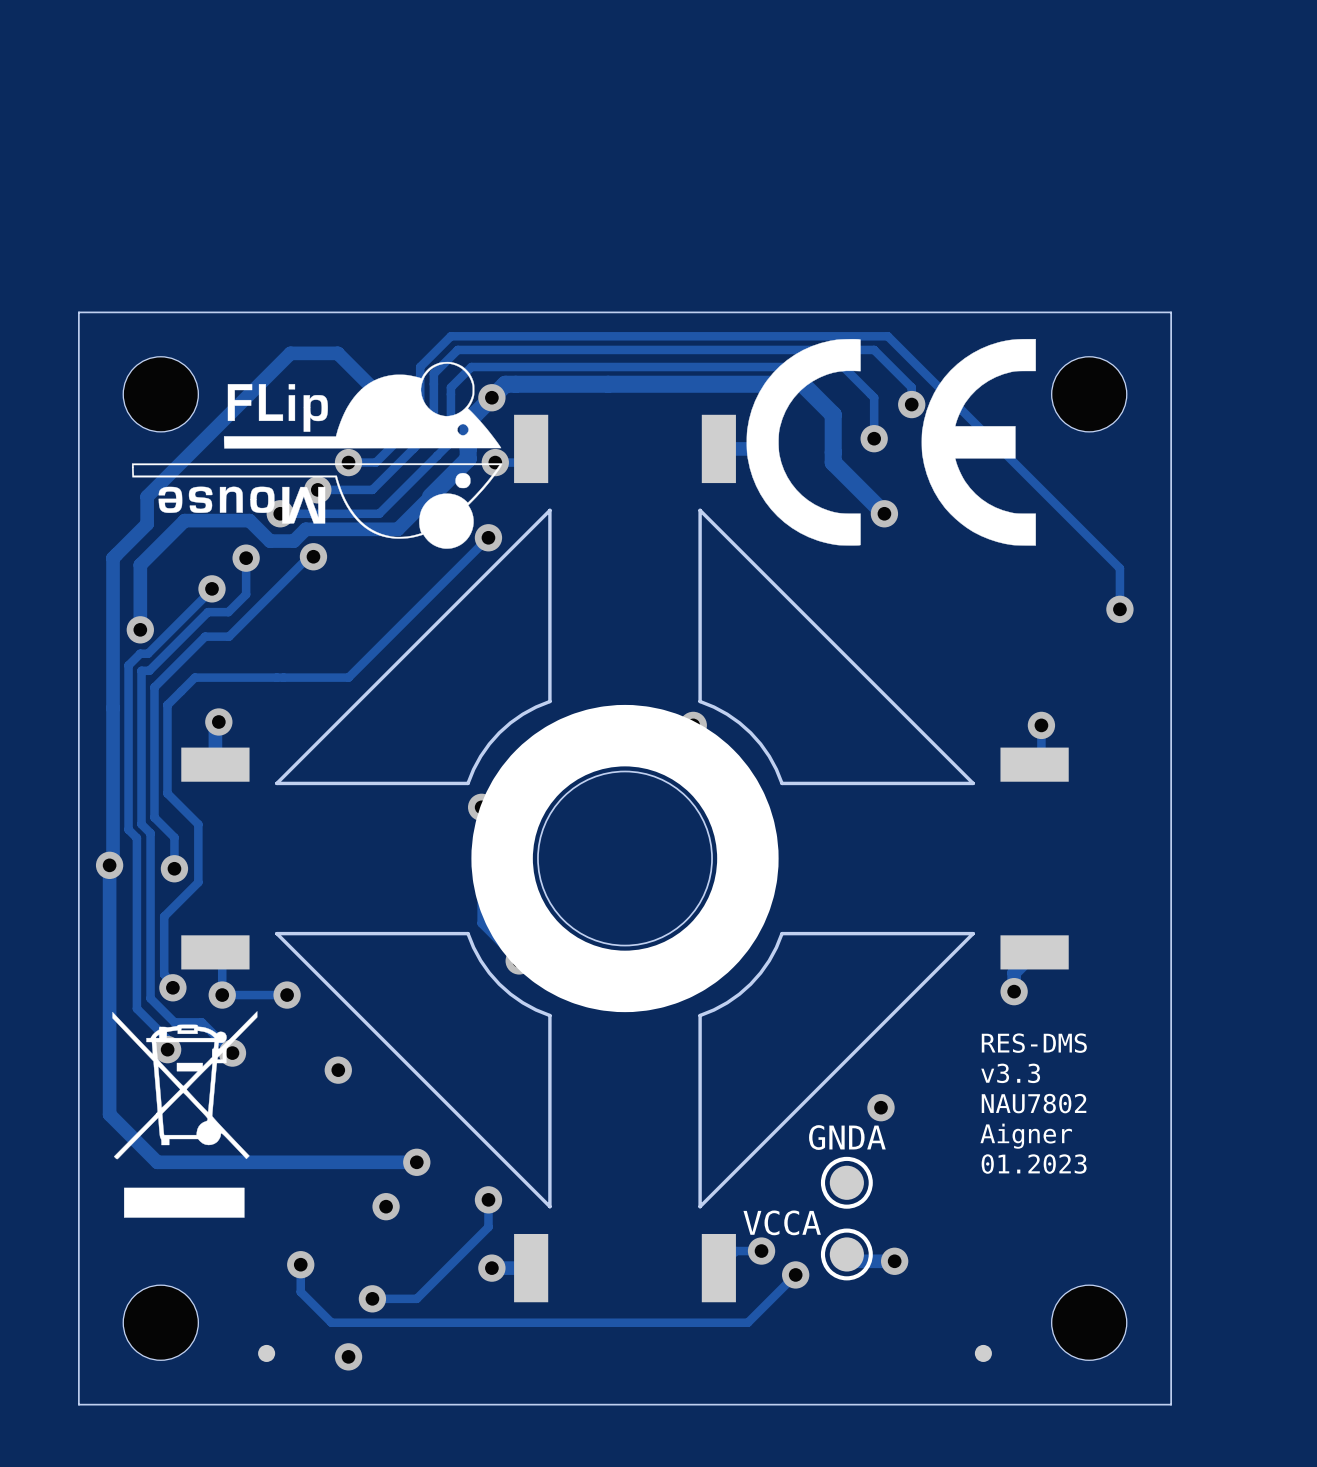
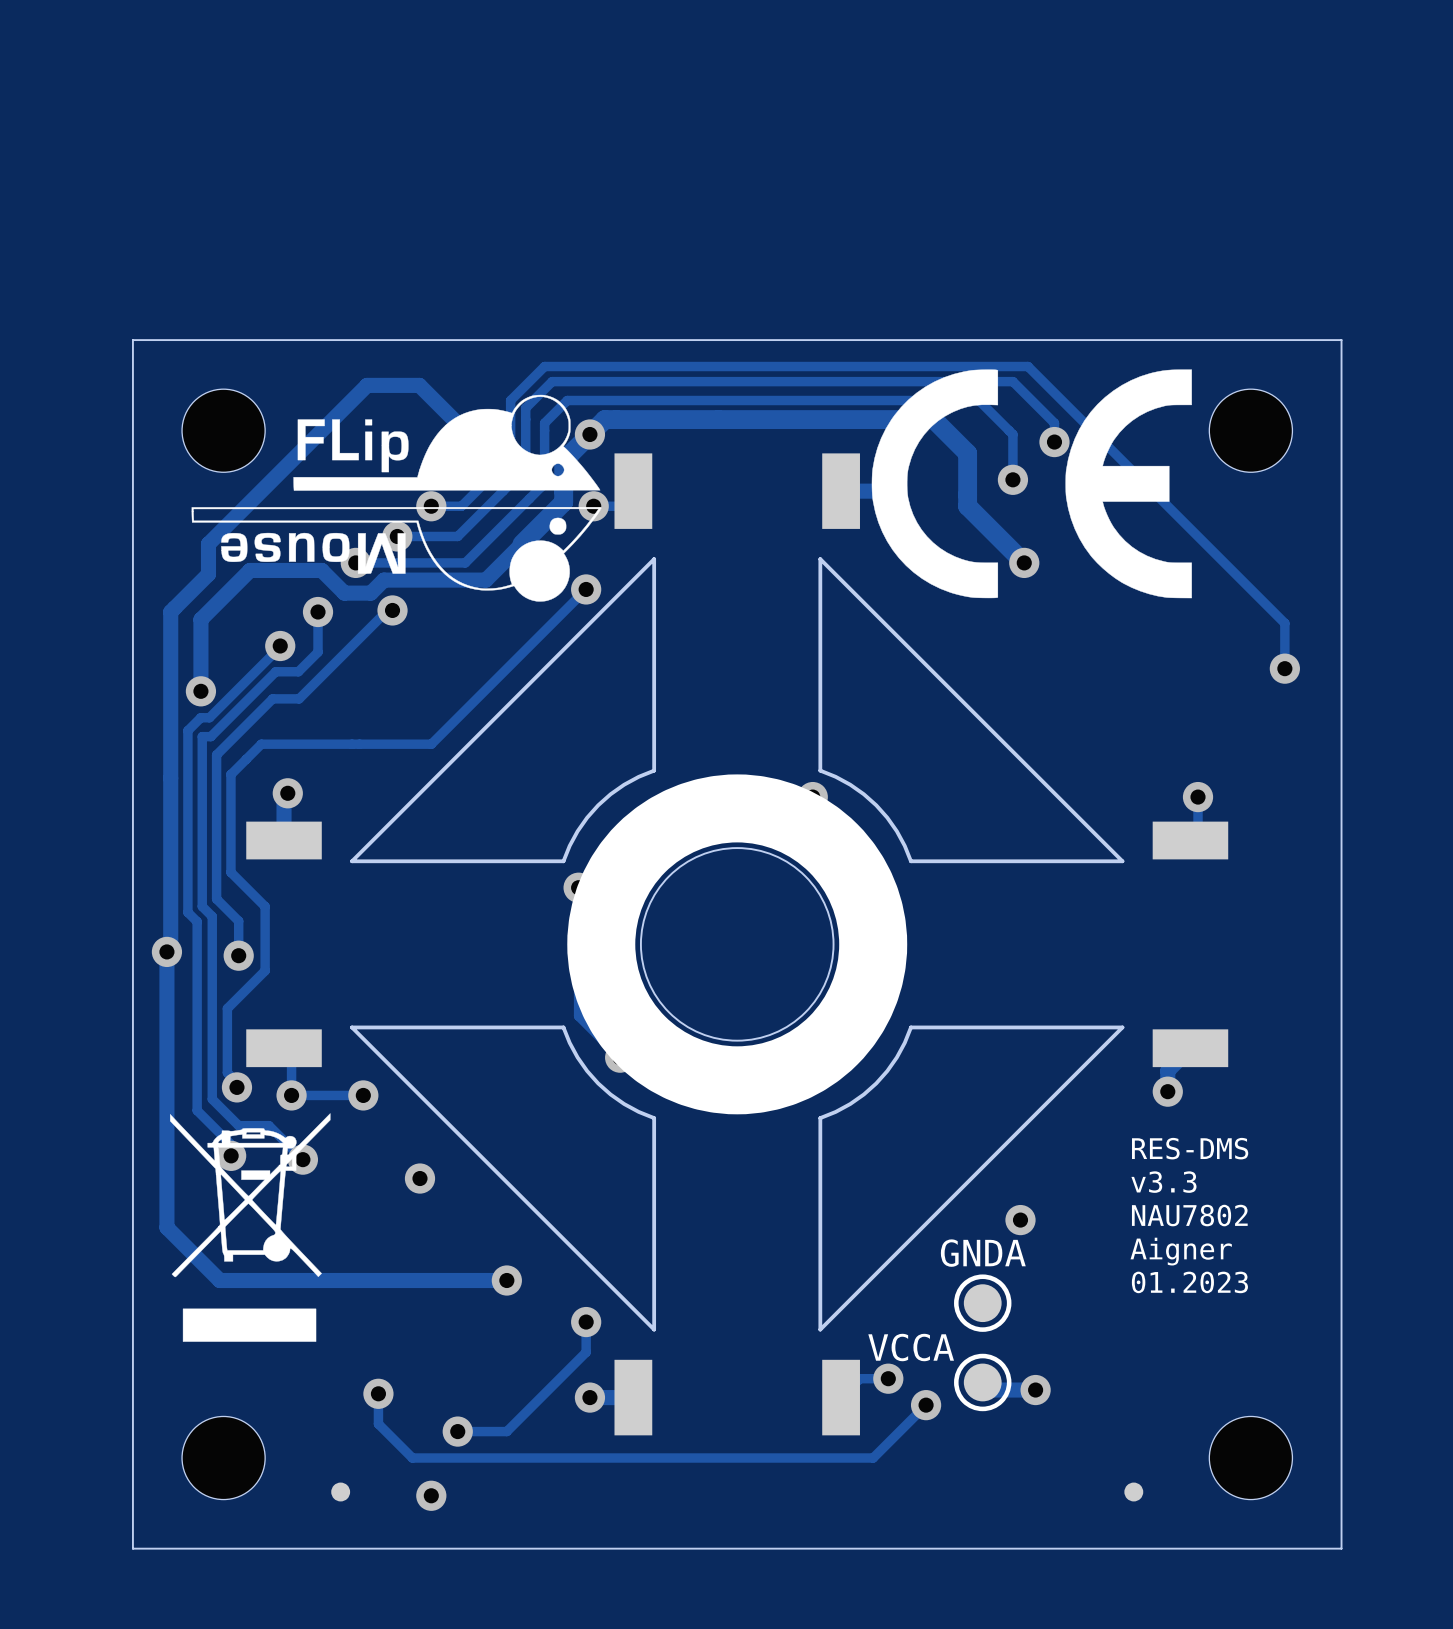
via: (386, 1206) -> none

